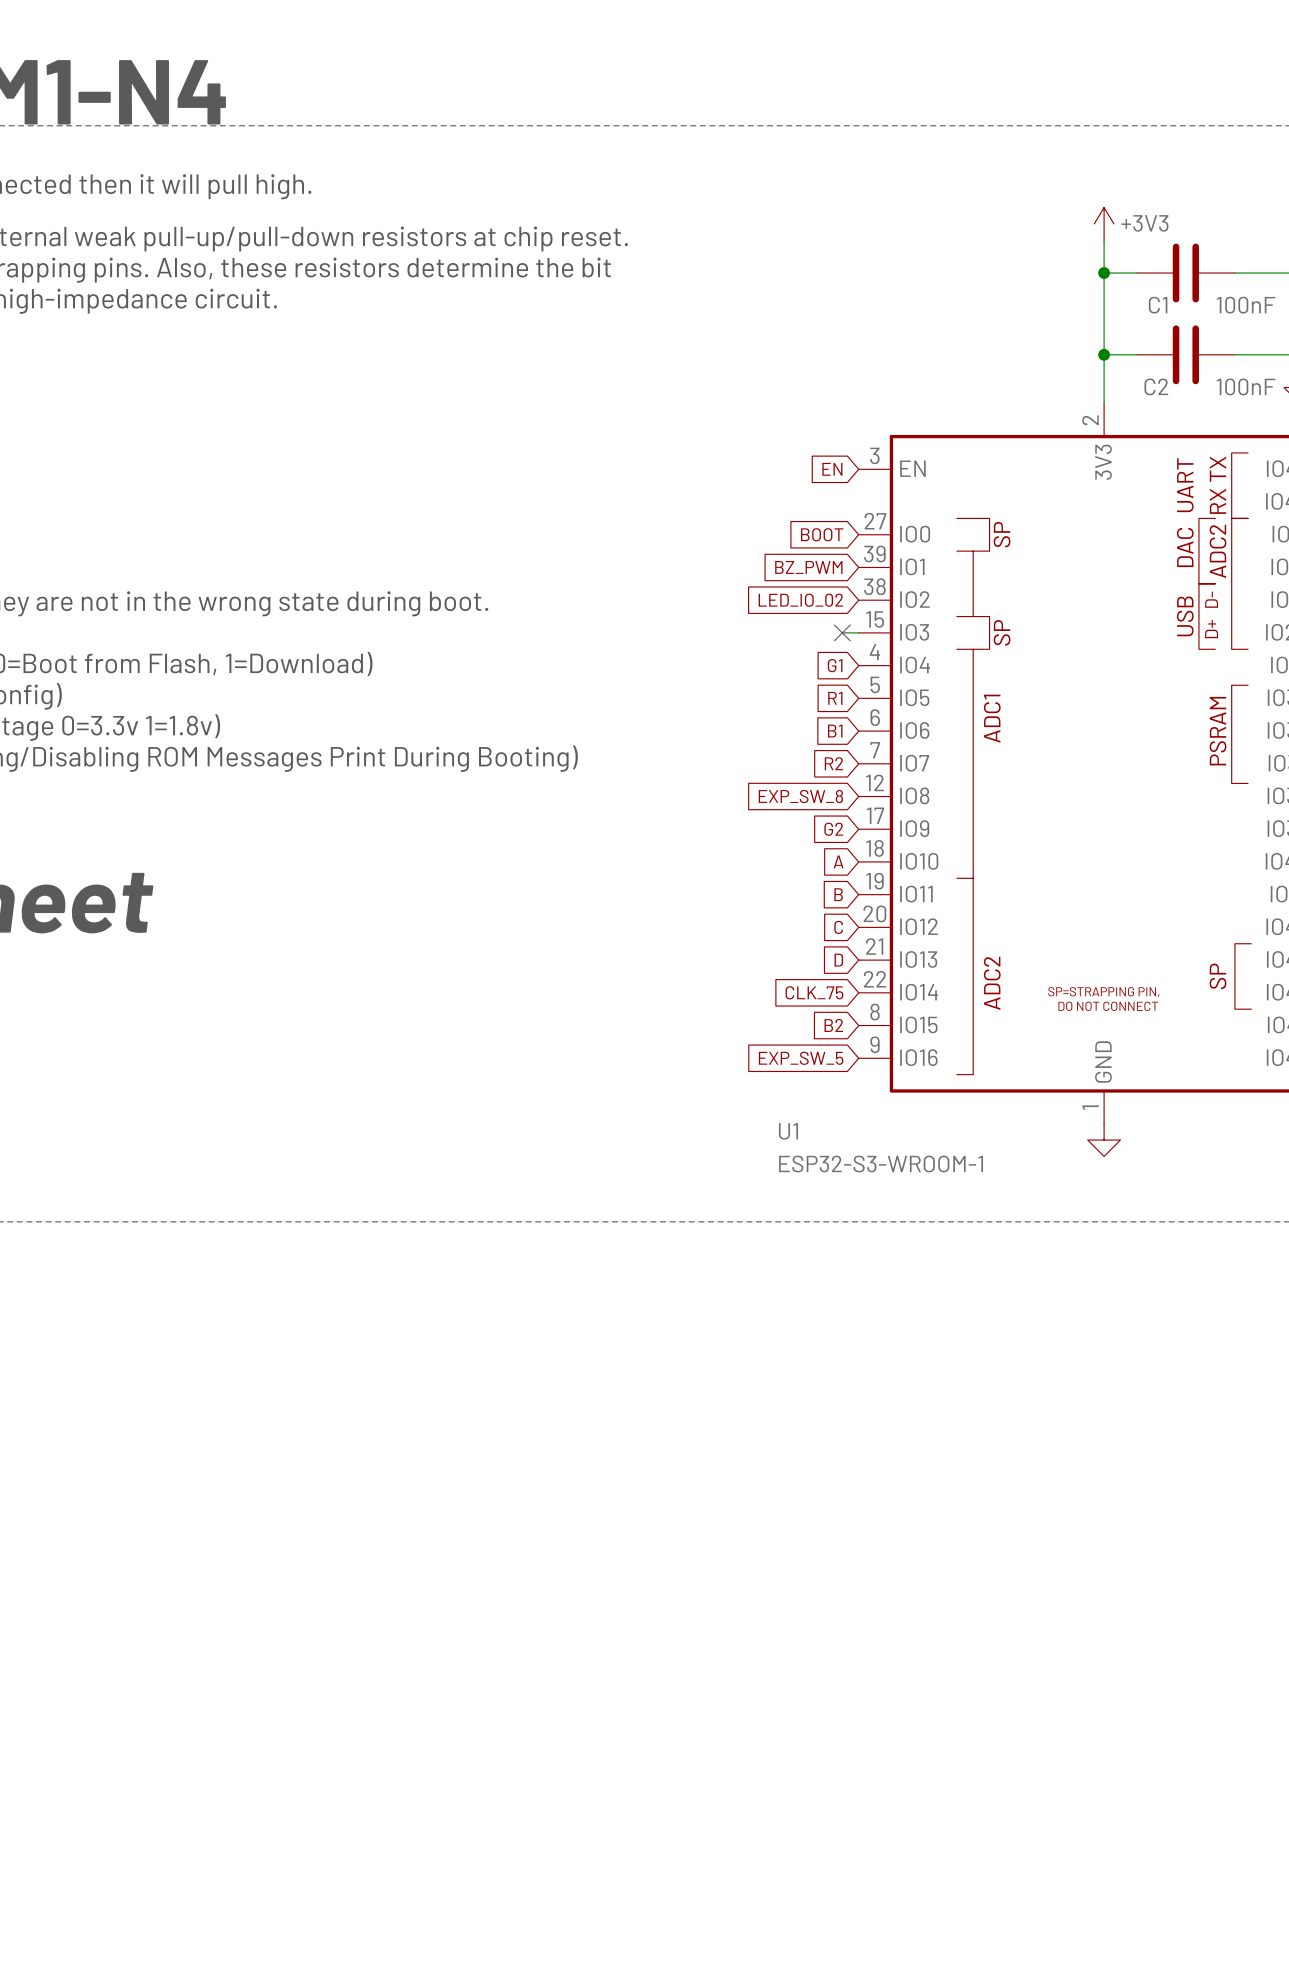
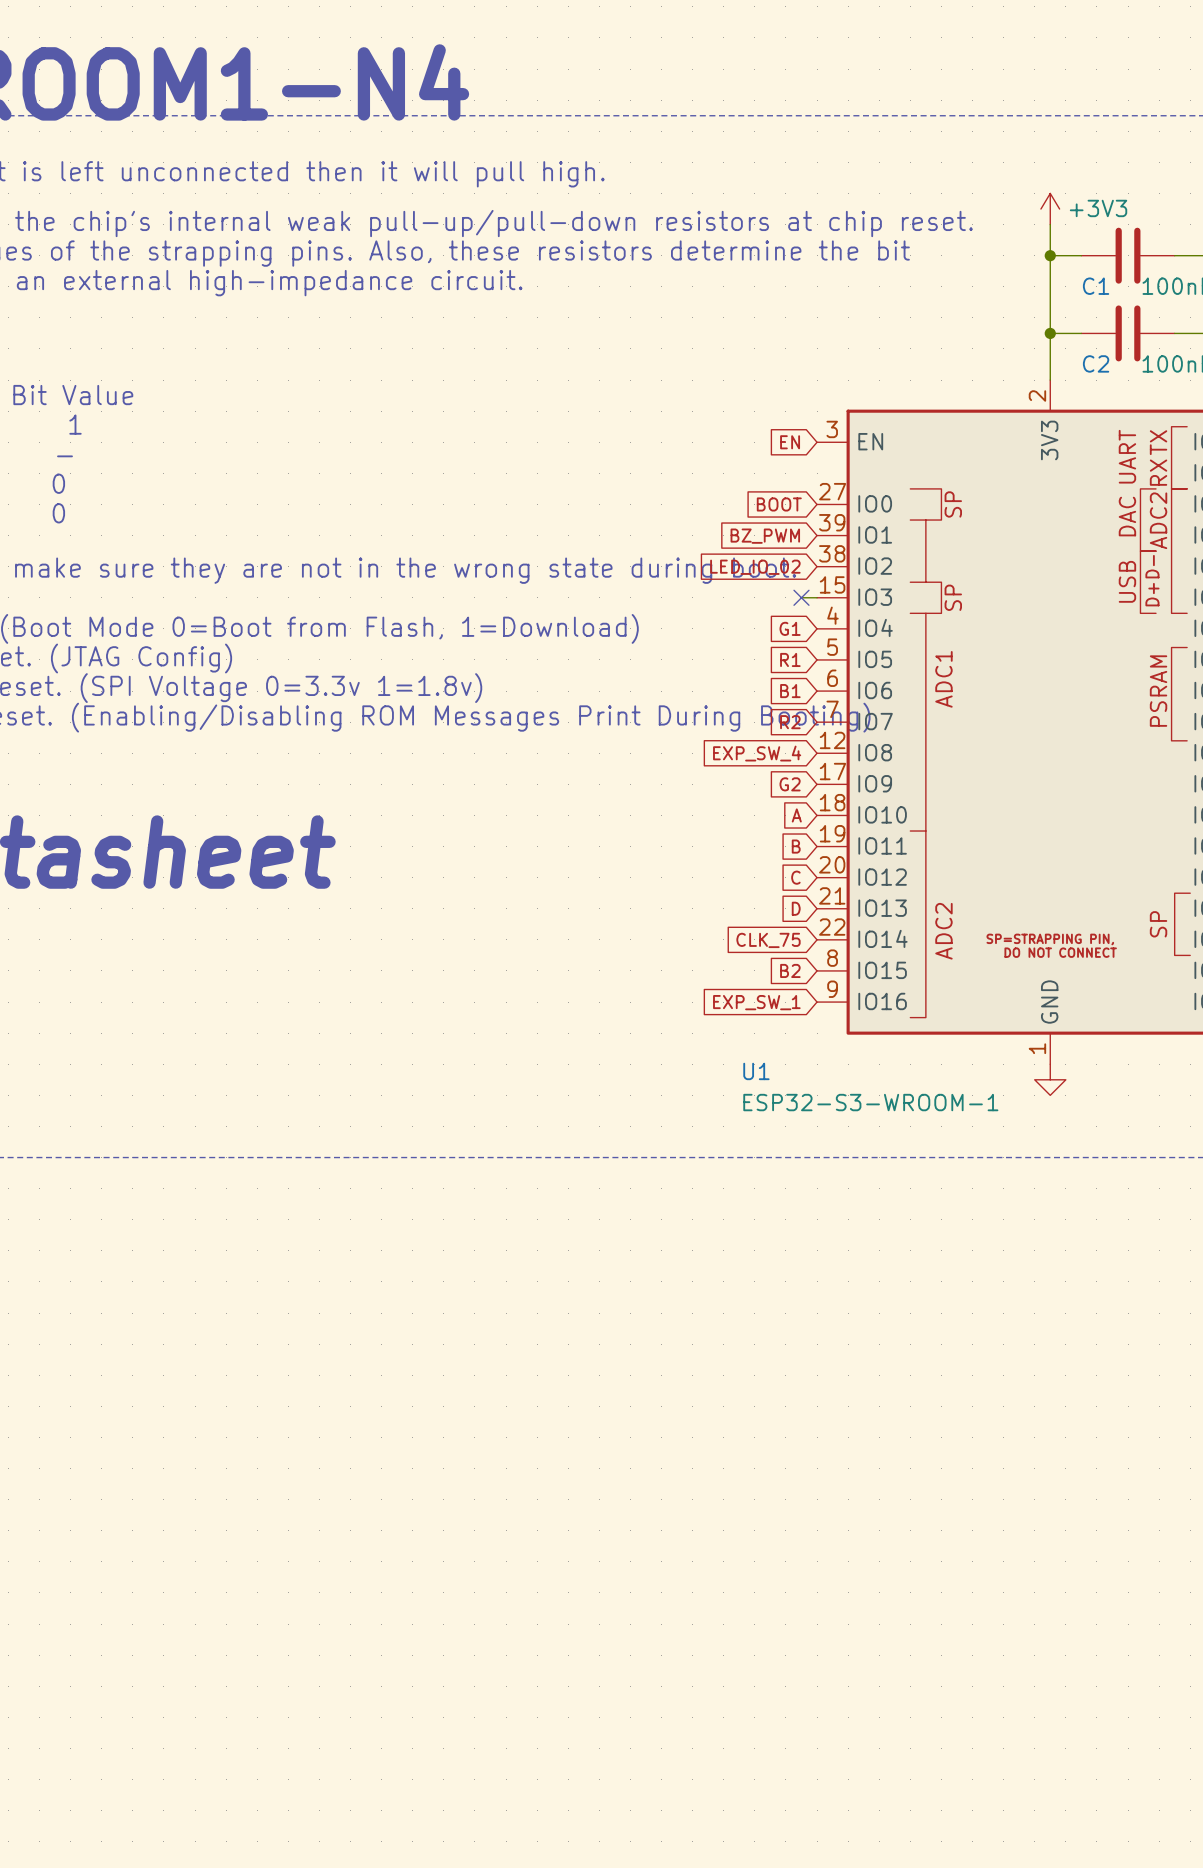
global label: EXP_SW_8 (800, 796) -> EXP_SW_4 (757, 753)
global label: EXP_SW_5 (801, 1058) -> EXP_SW_1 (756, 1002)

